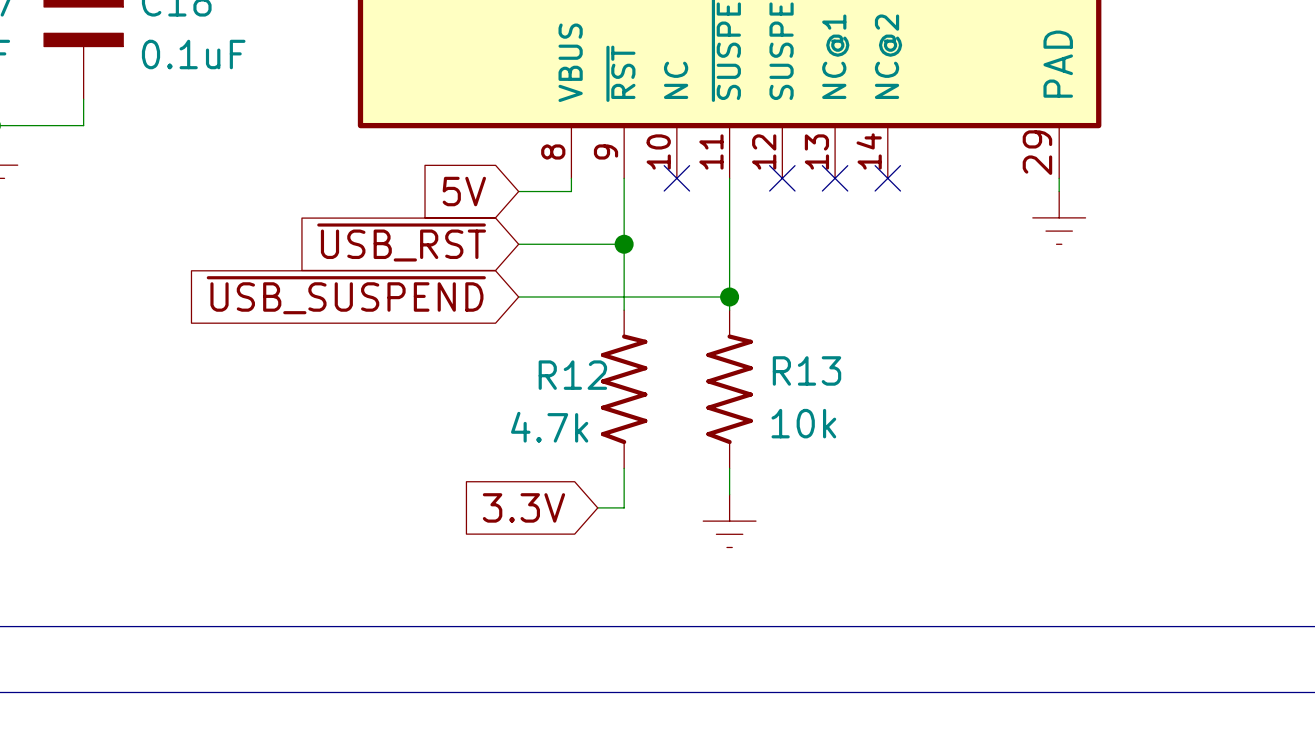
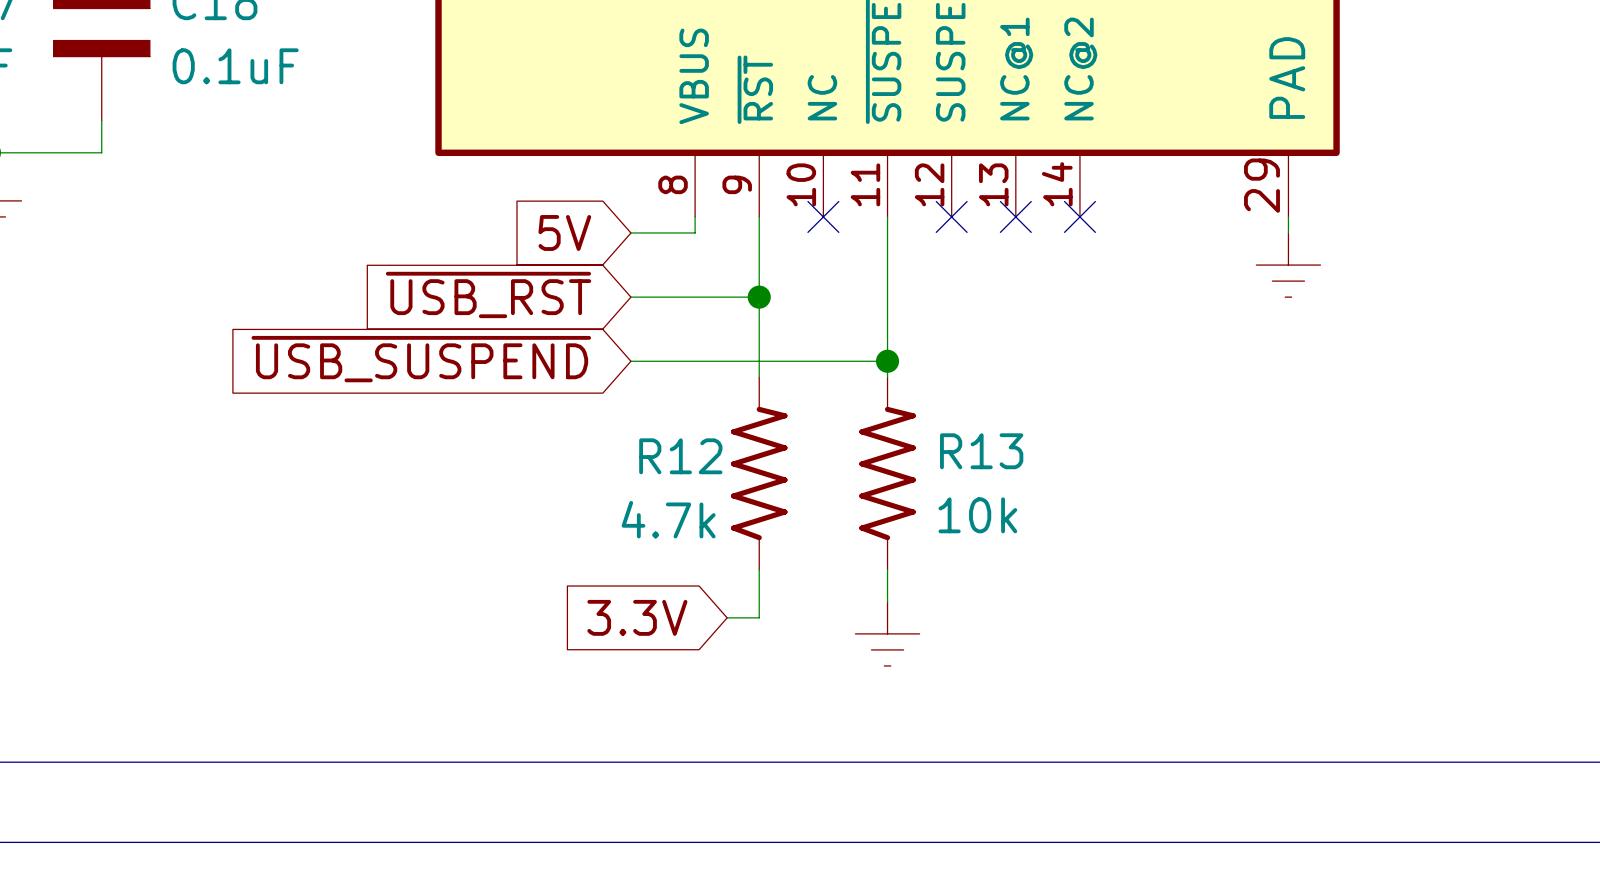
R12 name position: R12 (572, 375) -> R12 (680, 456)

